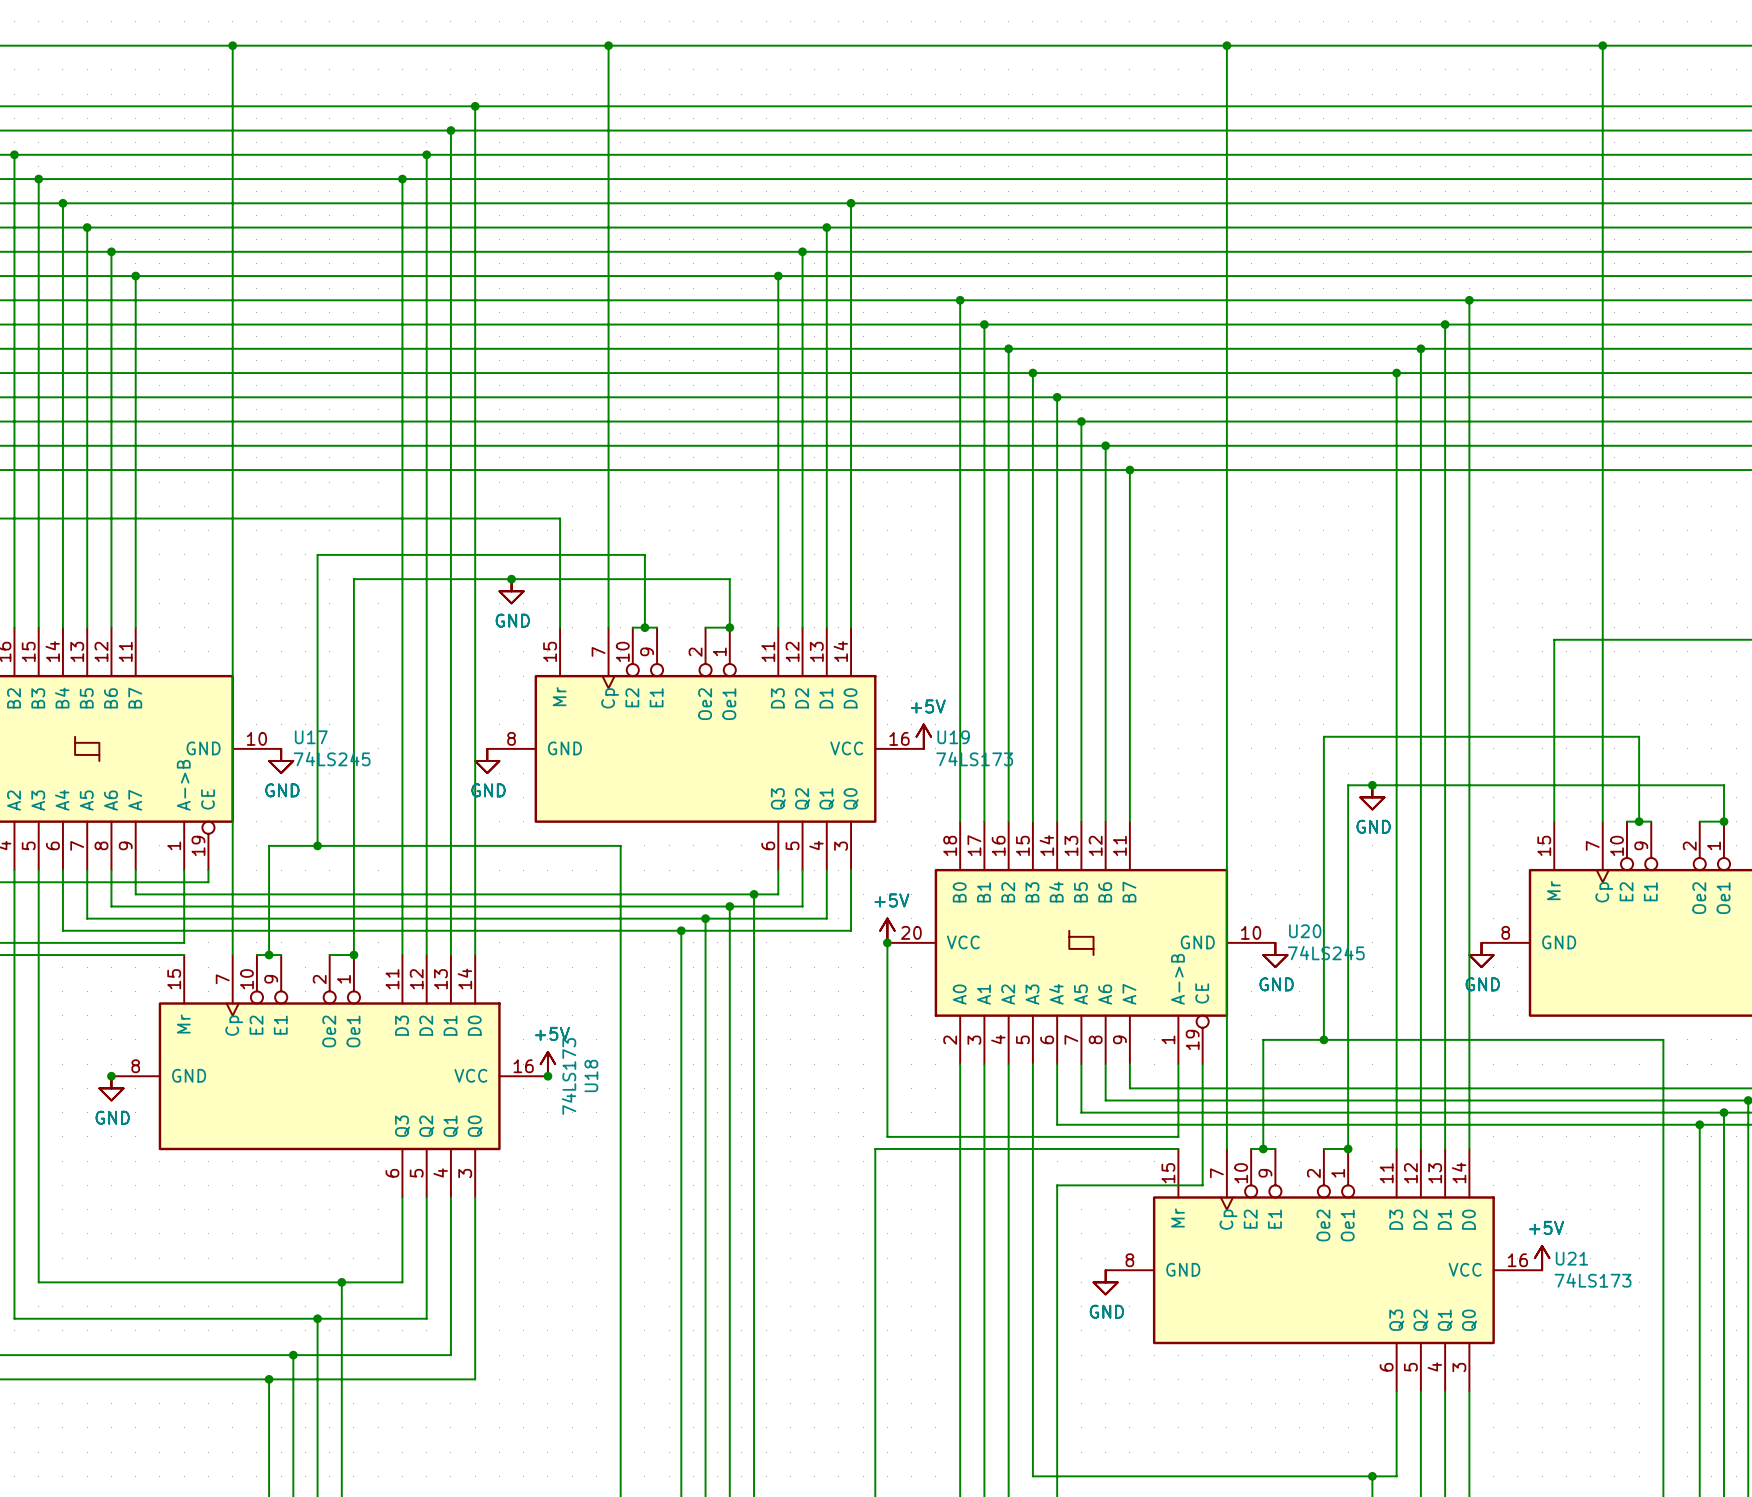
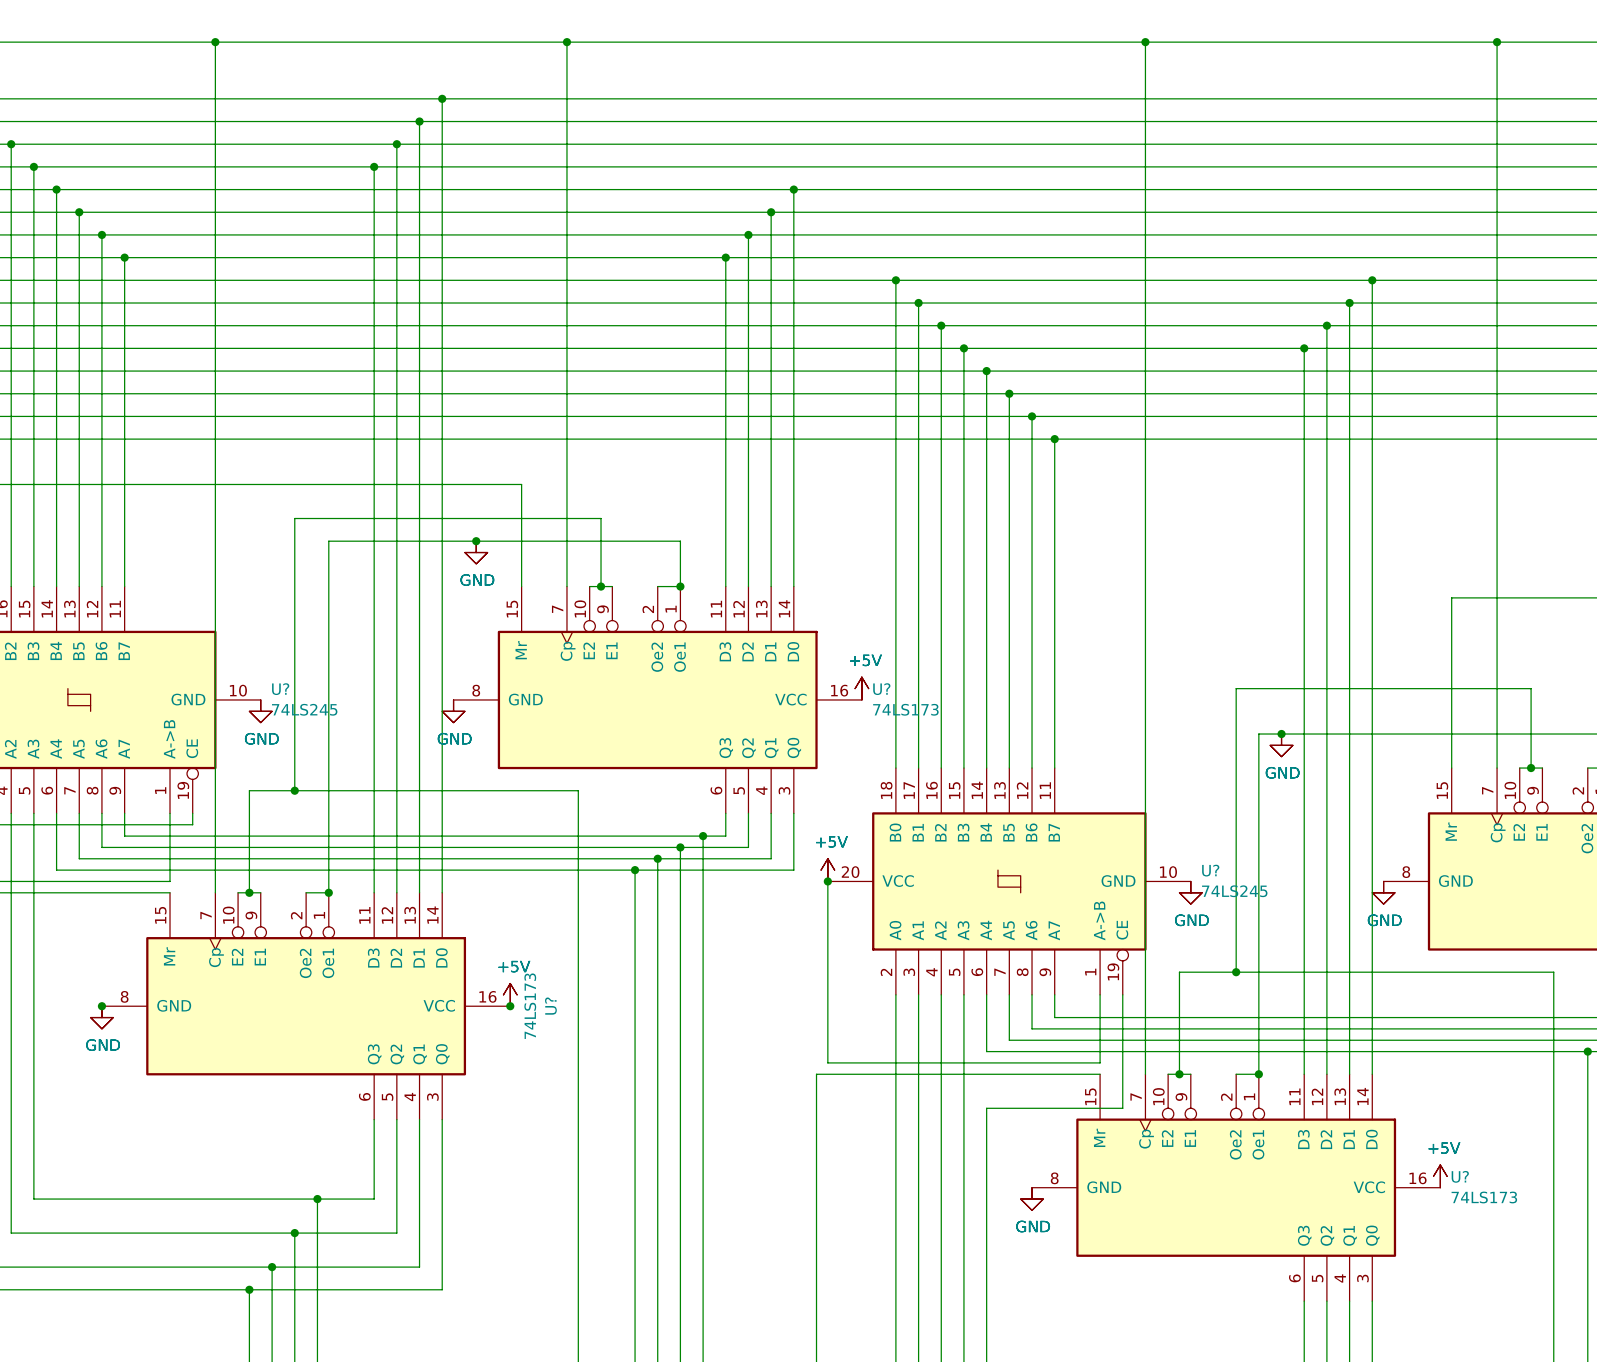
U17 name: U17 (311, 737) -> U? (280, 689)
U19 name: U19 (953, 737) -> U? (881, 689)
U20 name: U20 (1305, 931) -> U? (1210, 870)
U18 name: U18 (591, 1075) -> U? (550, 1006)
U21 name: U21 (1571, 1258) -> U? (1460, 1176)

